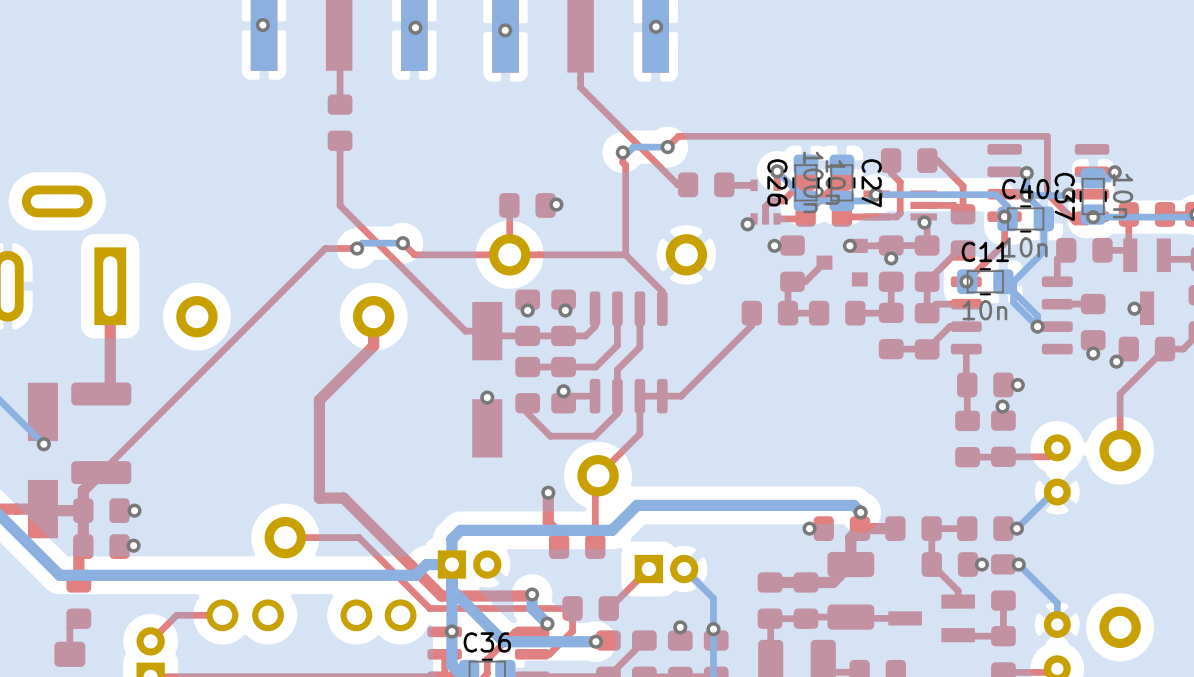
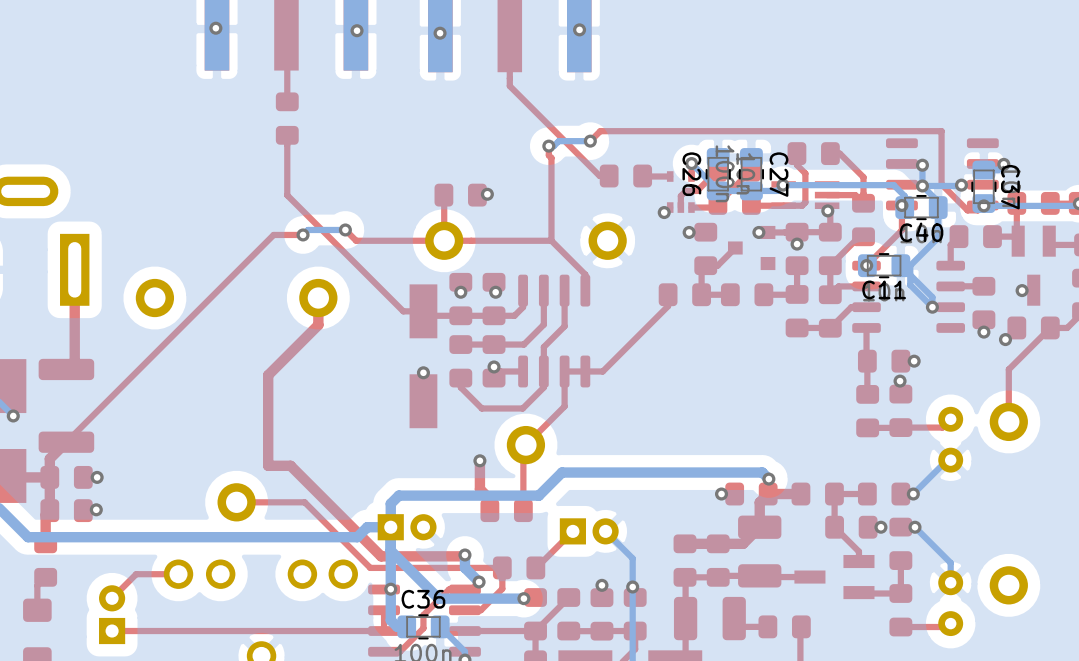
C40 name position: C40 (1025, 188) -> C40 (921, 232)
C37 name position: C37 (1064, 196) -> C37 (1010, 187)
C11 name position: C11 (985, 251) -> C11 (884, 289)

